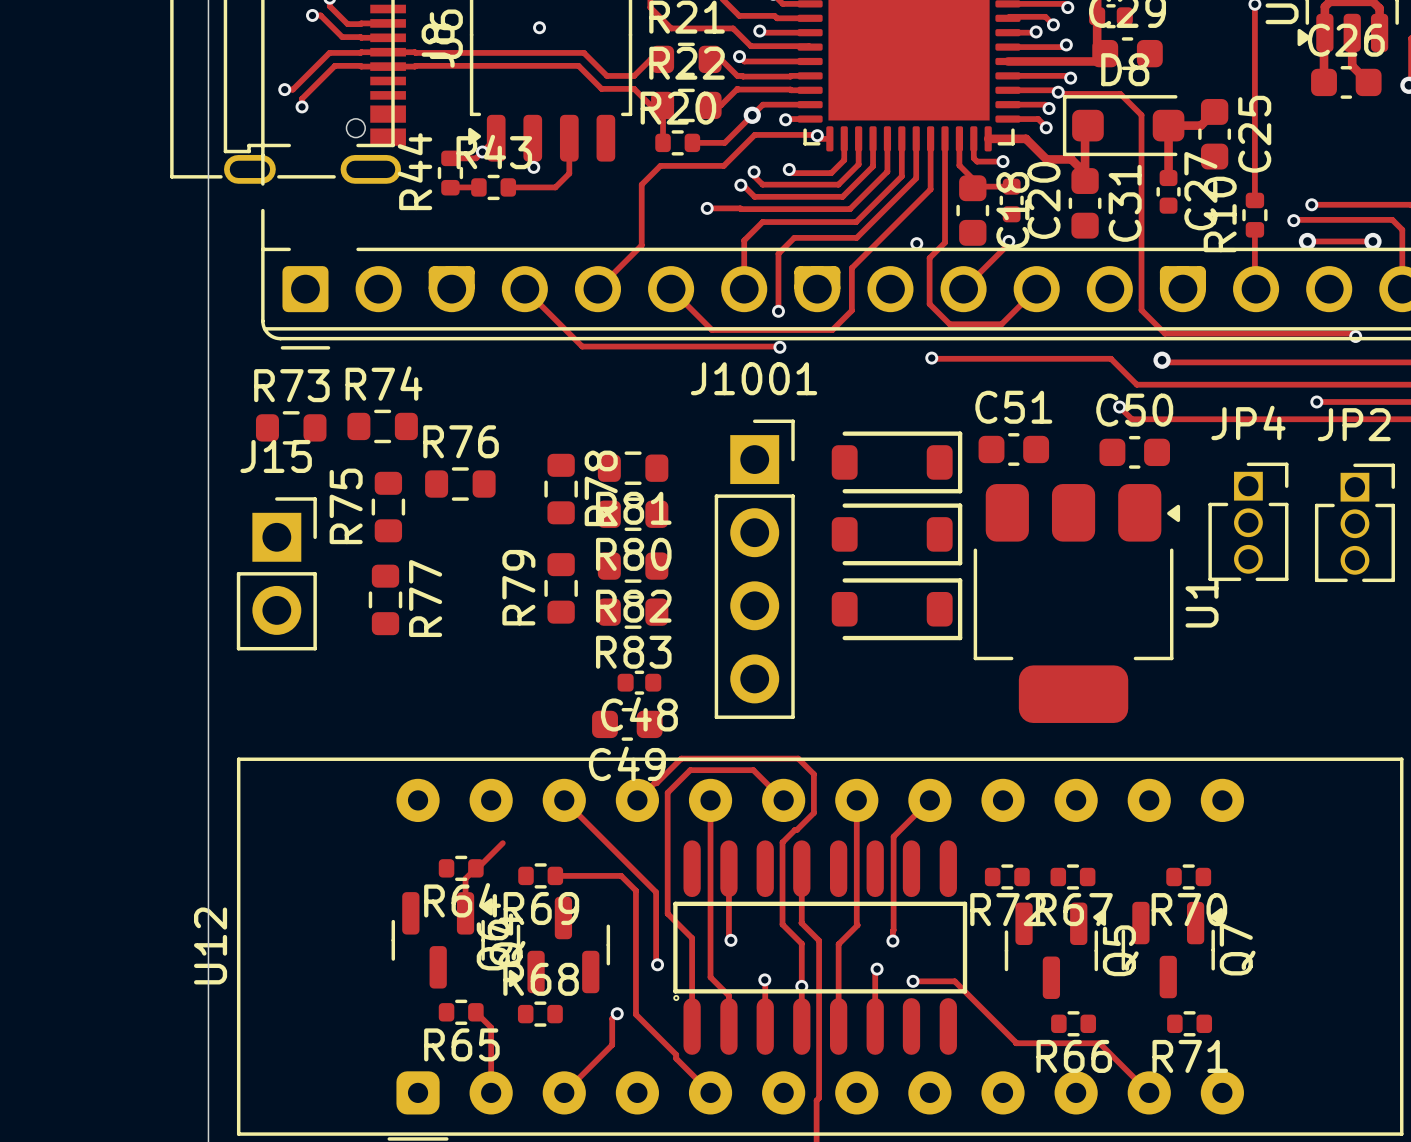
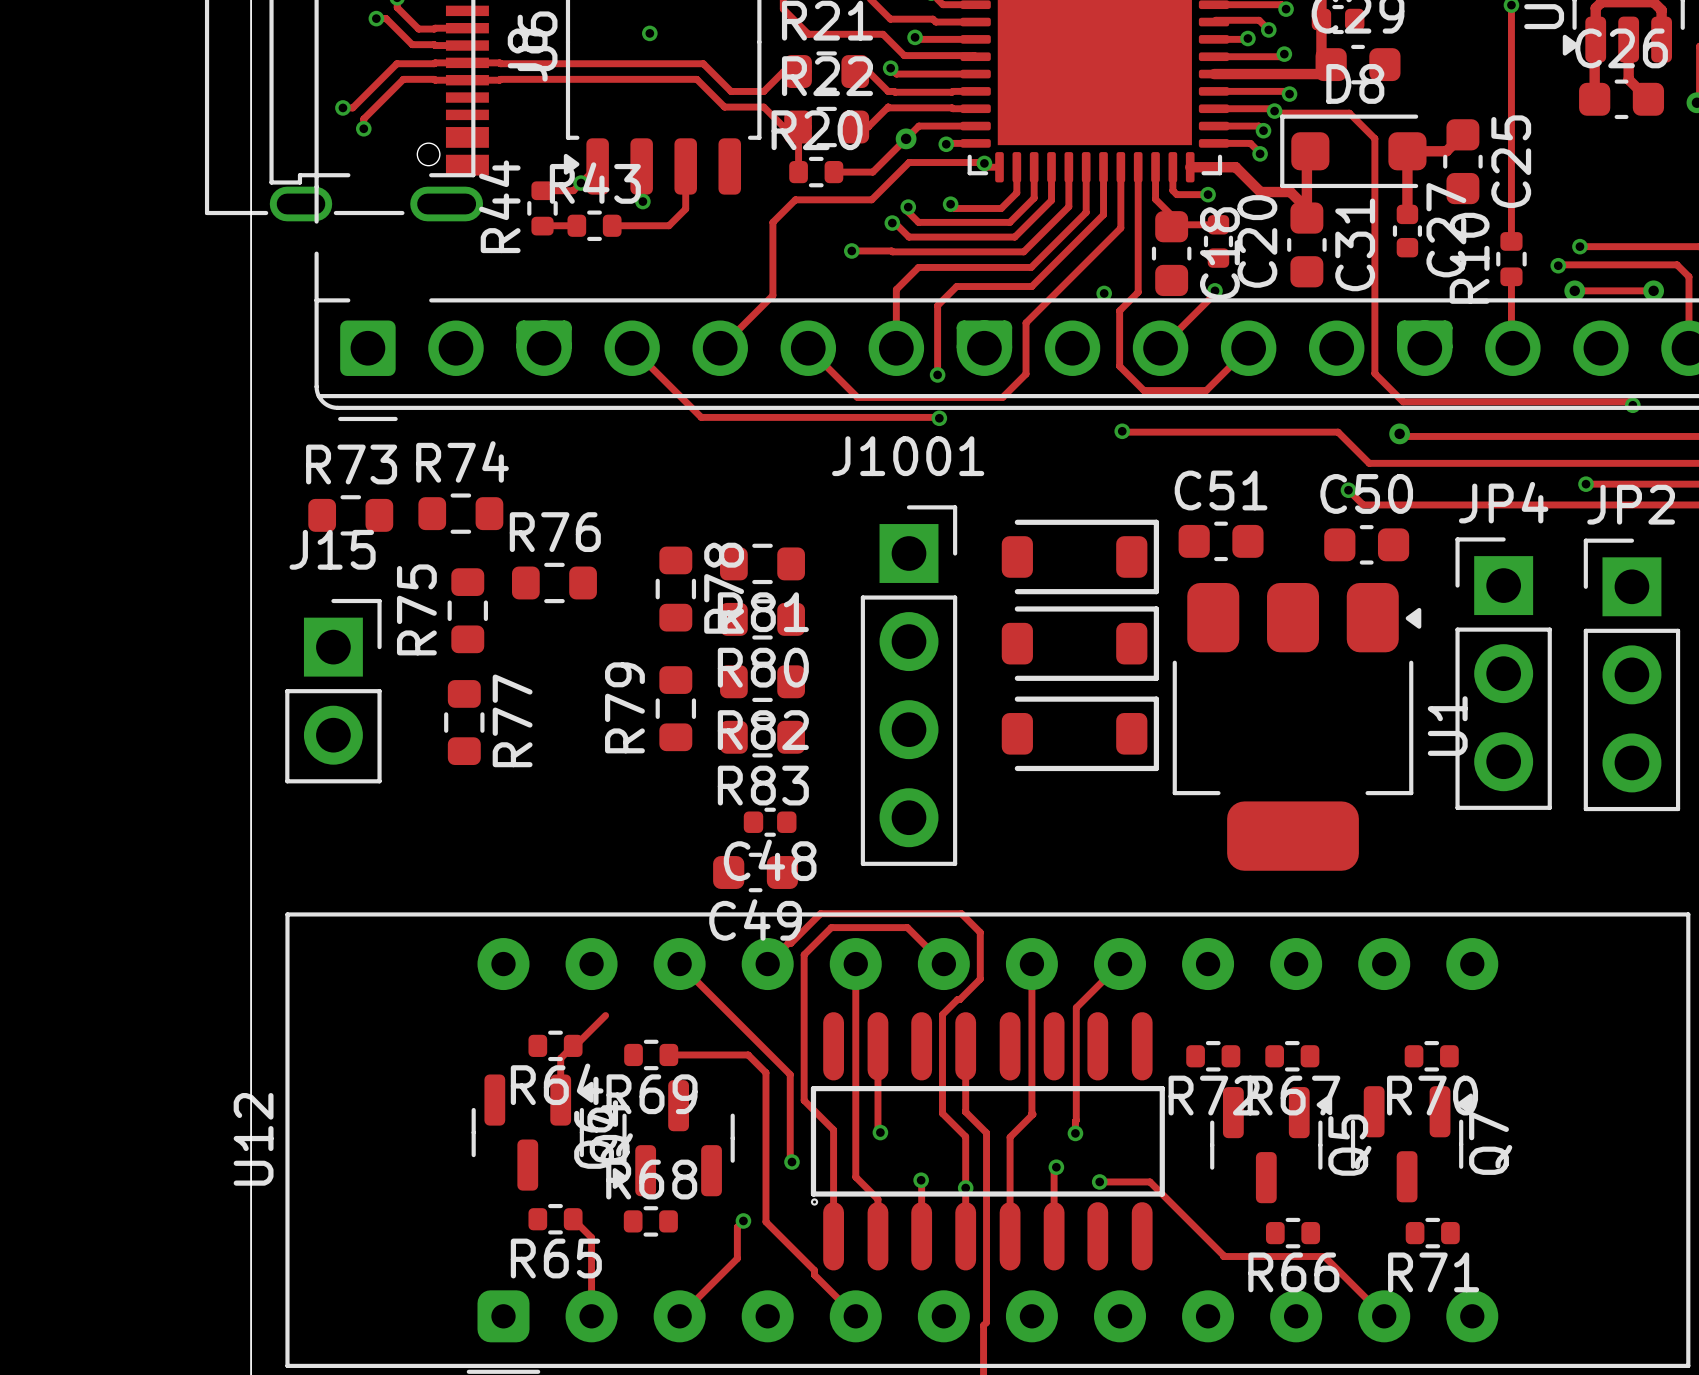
JP4 footprint: [1208, 462, 1289, 582] -> [1455, 537, 1552, 810]
JP2 footprint: [1314, 463, 1395, 583] -> [1583, 538, 1681, 812]

